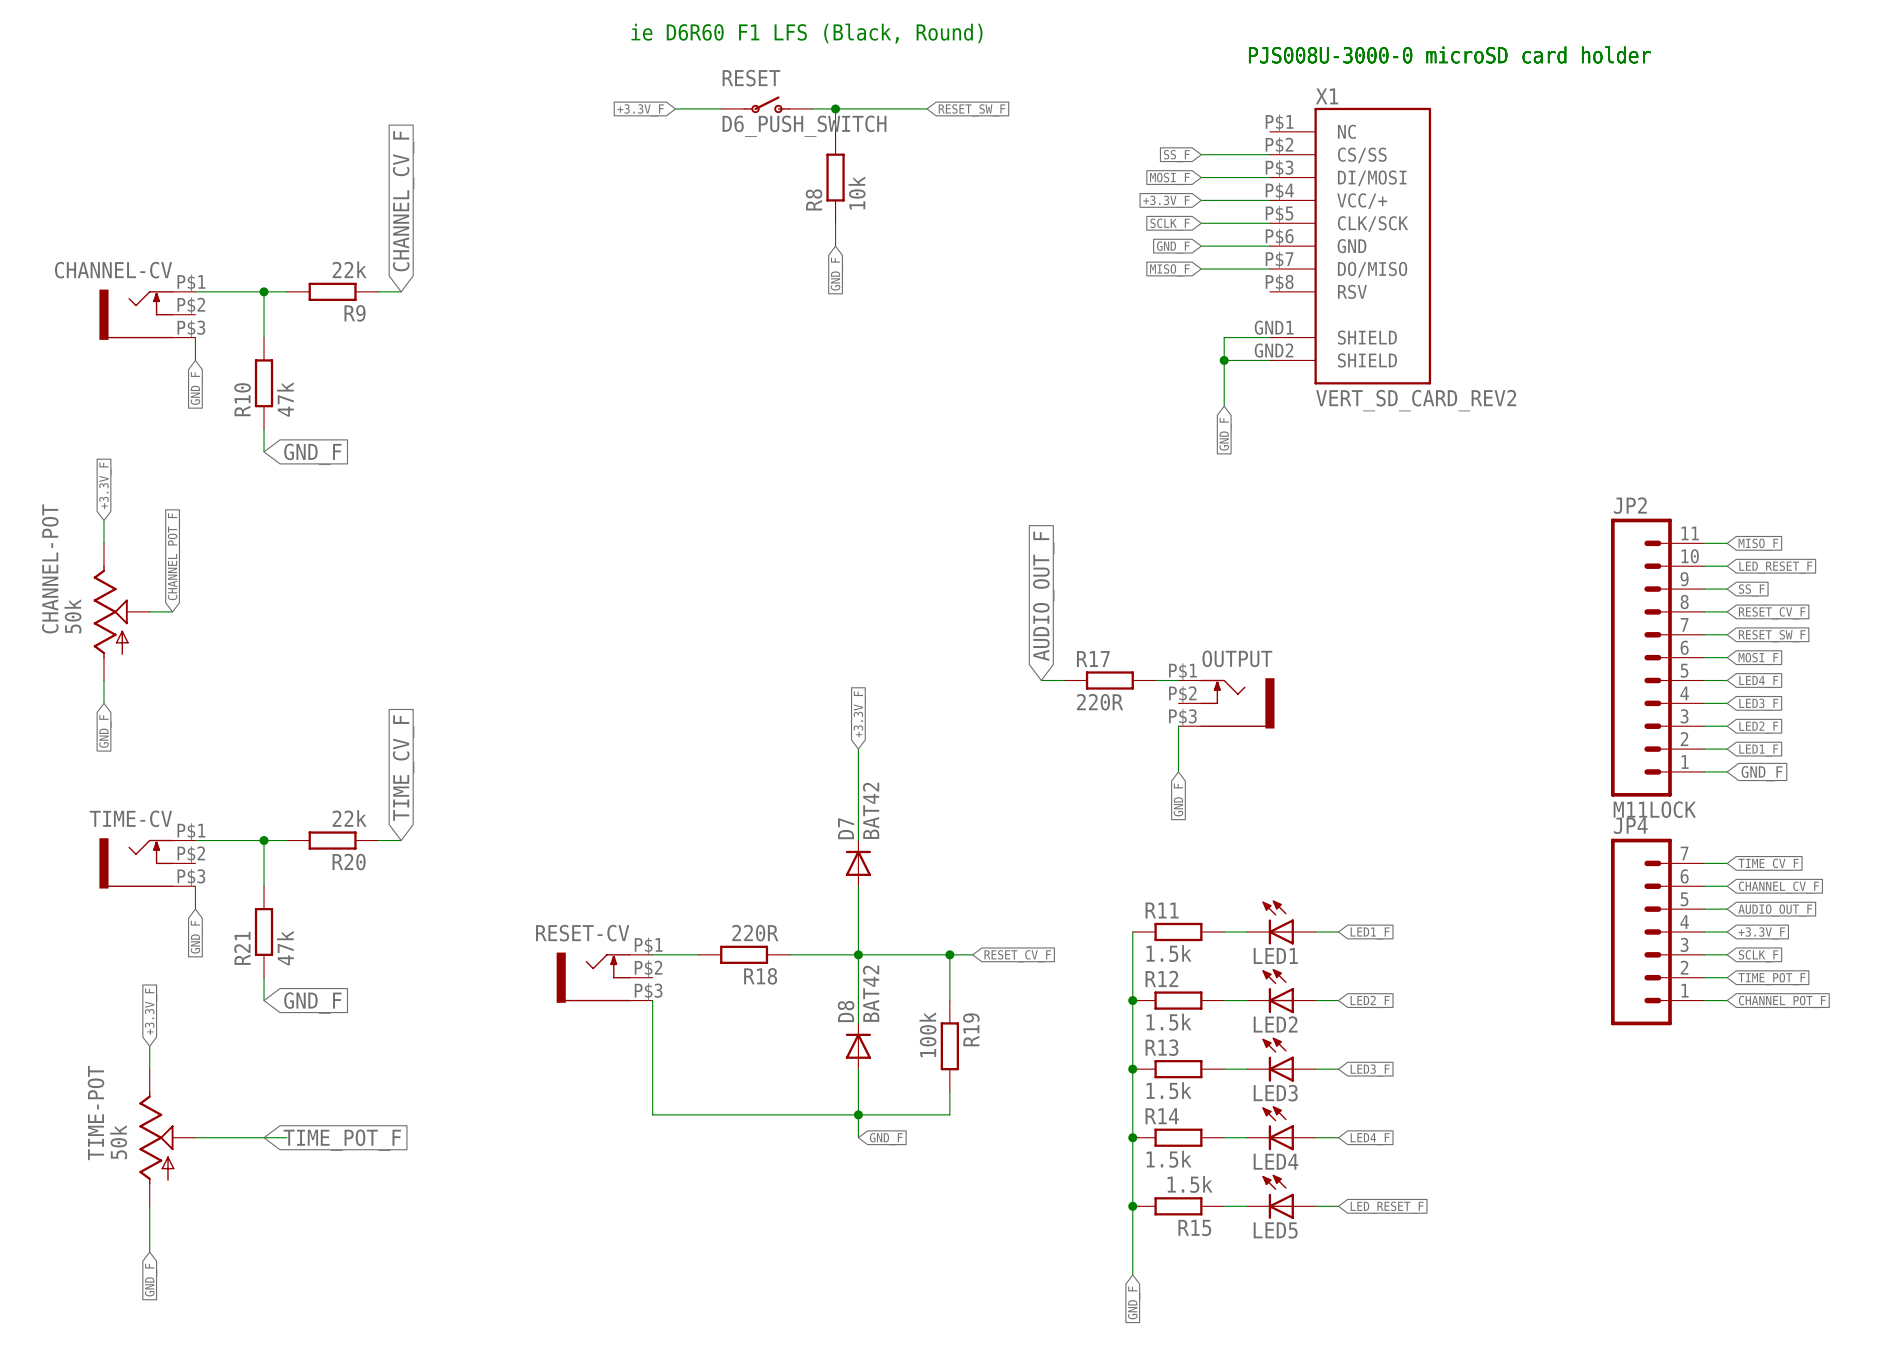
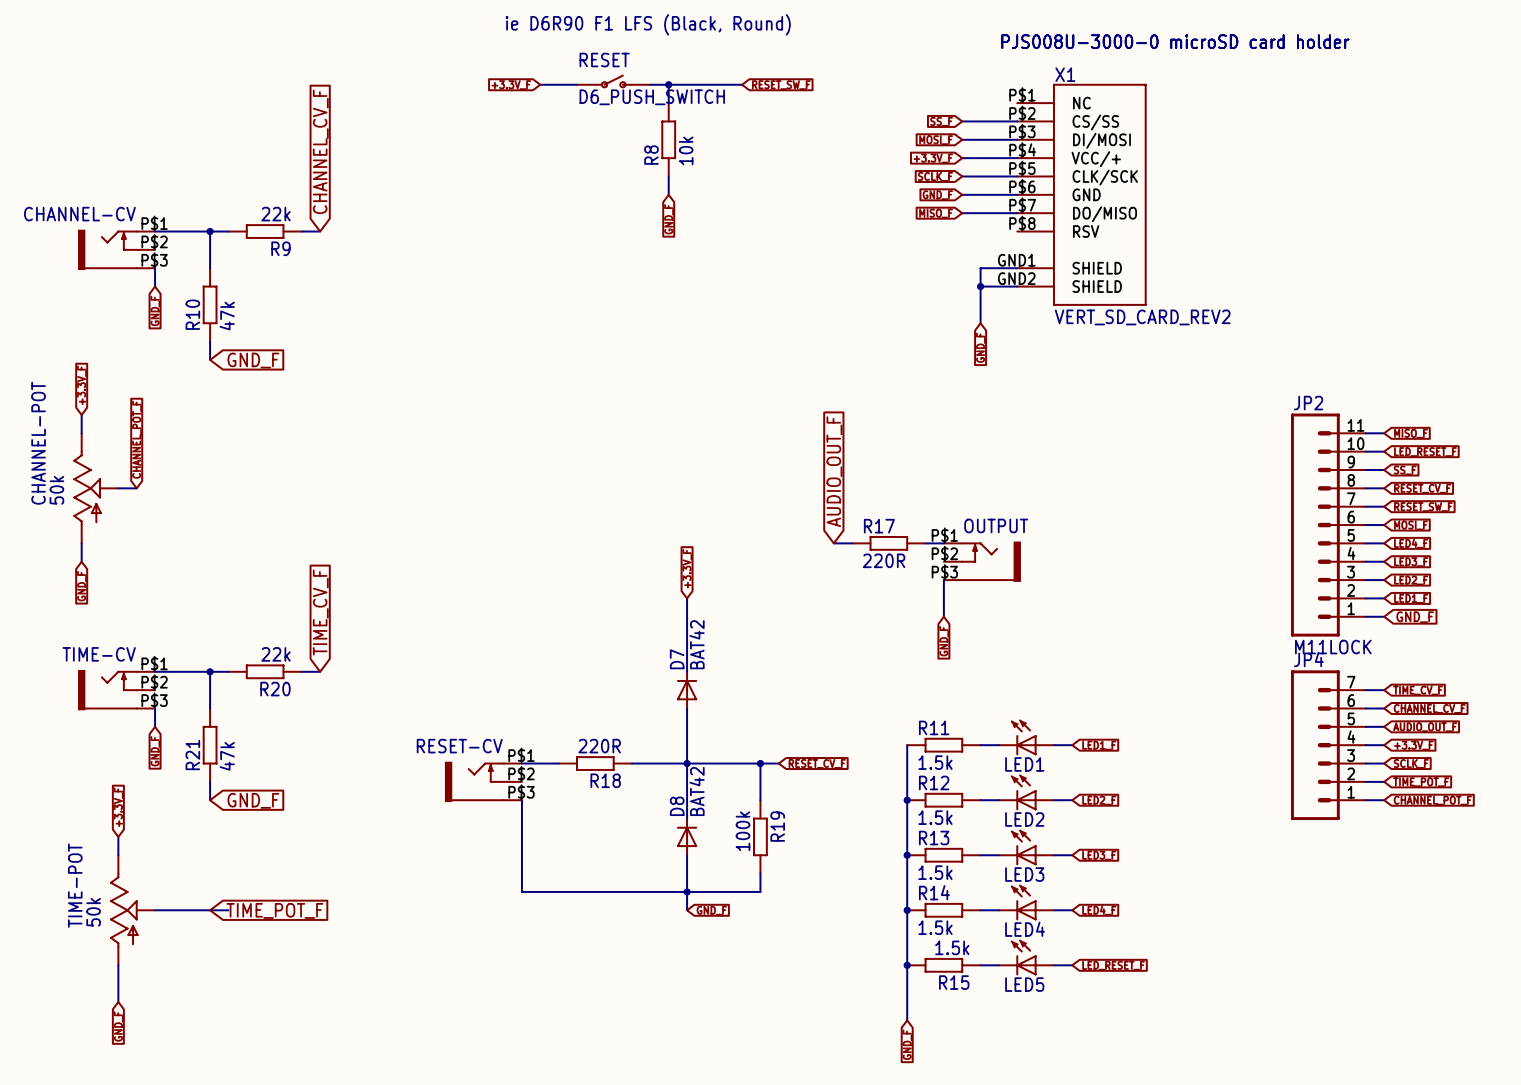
text: ie D6R60 F1 LFS (Black, Round) (807, 33) -> ie D6R90 F1 LFS (Black, Round) (648, 24)

